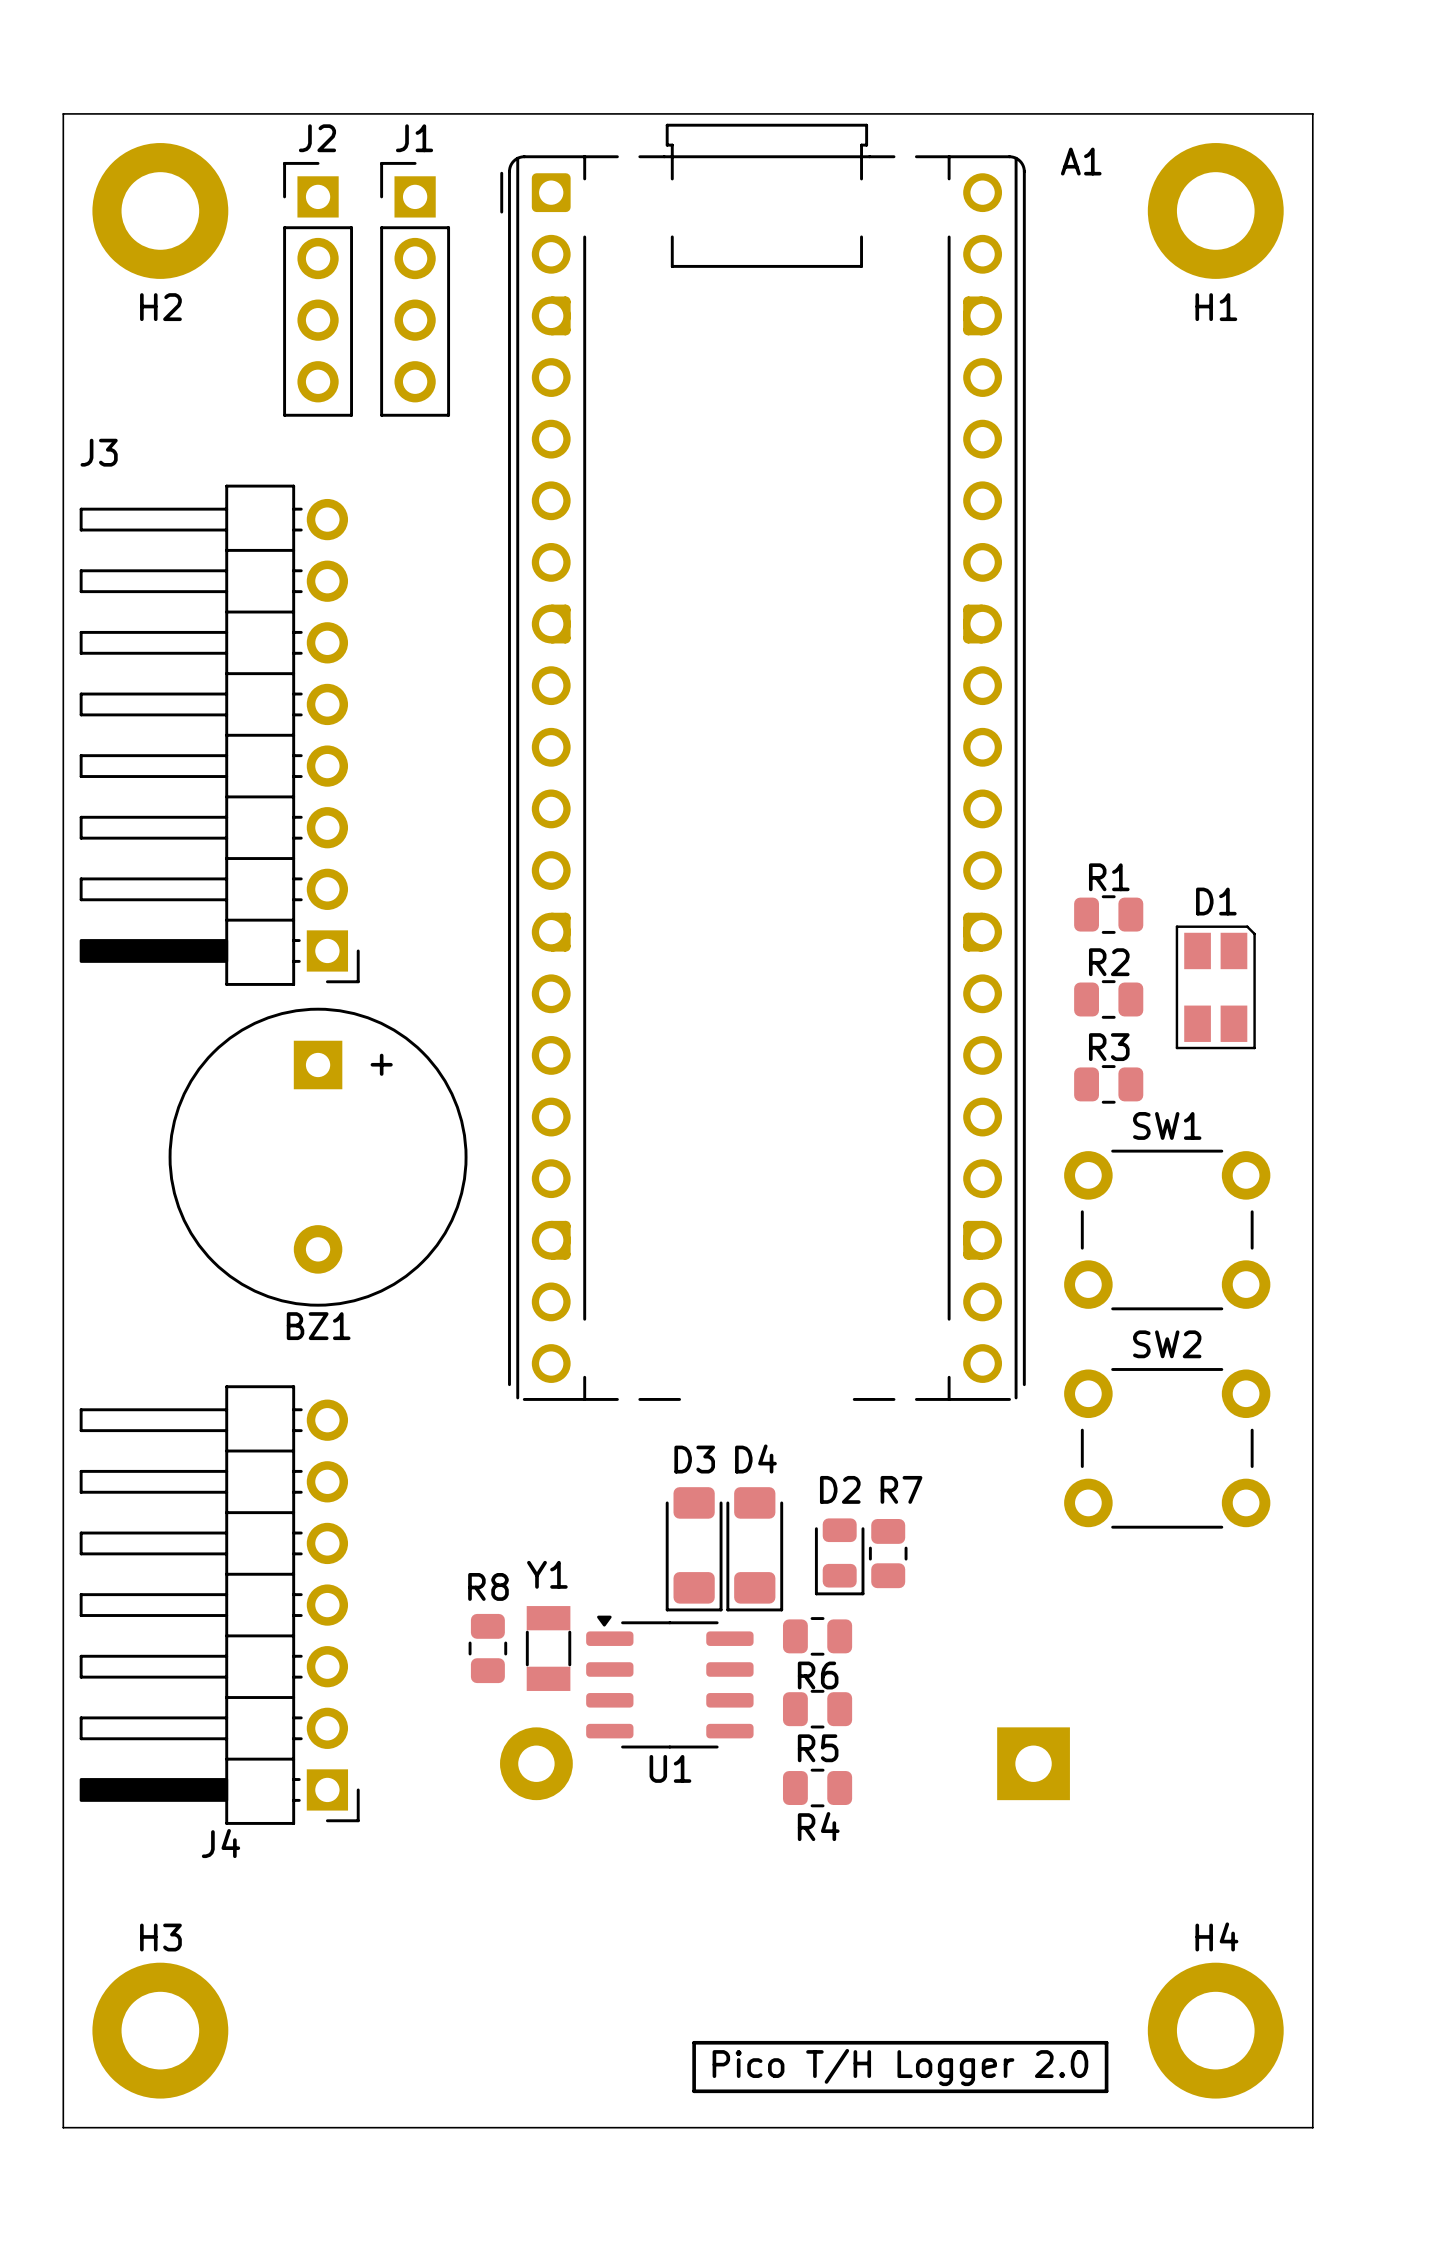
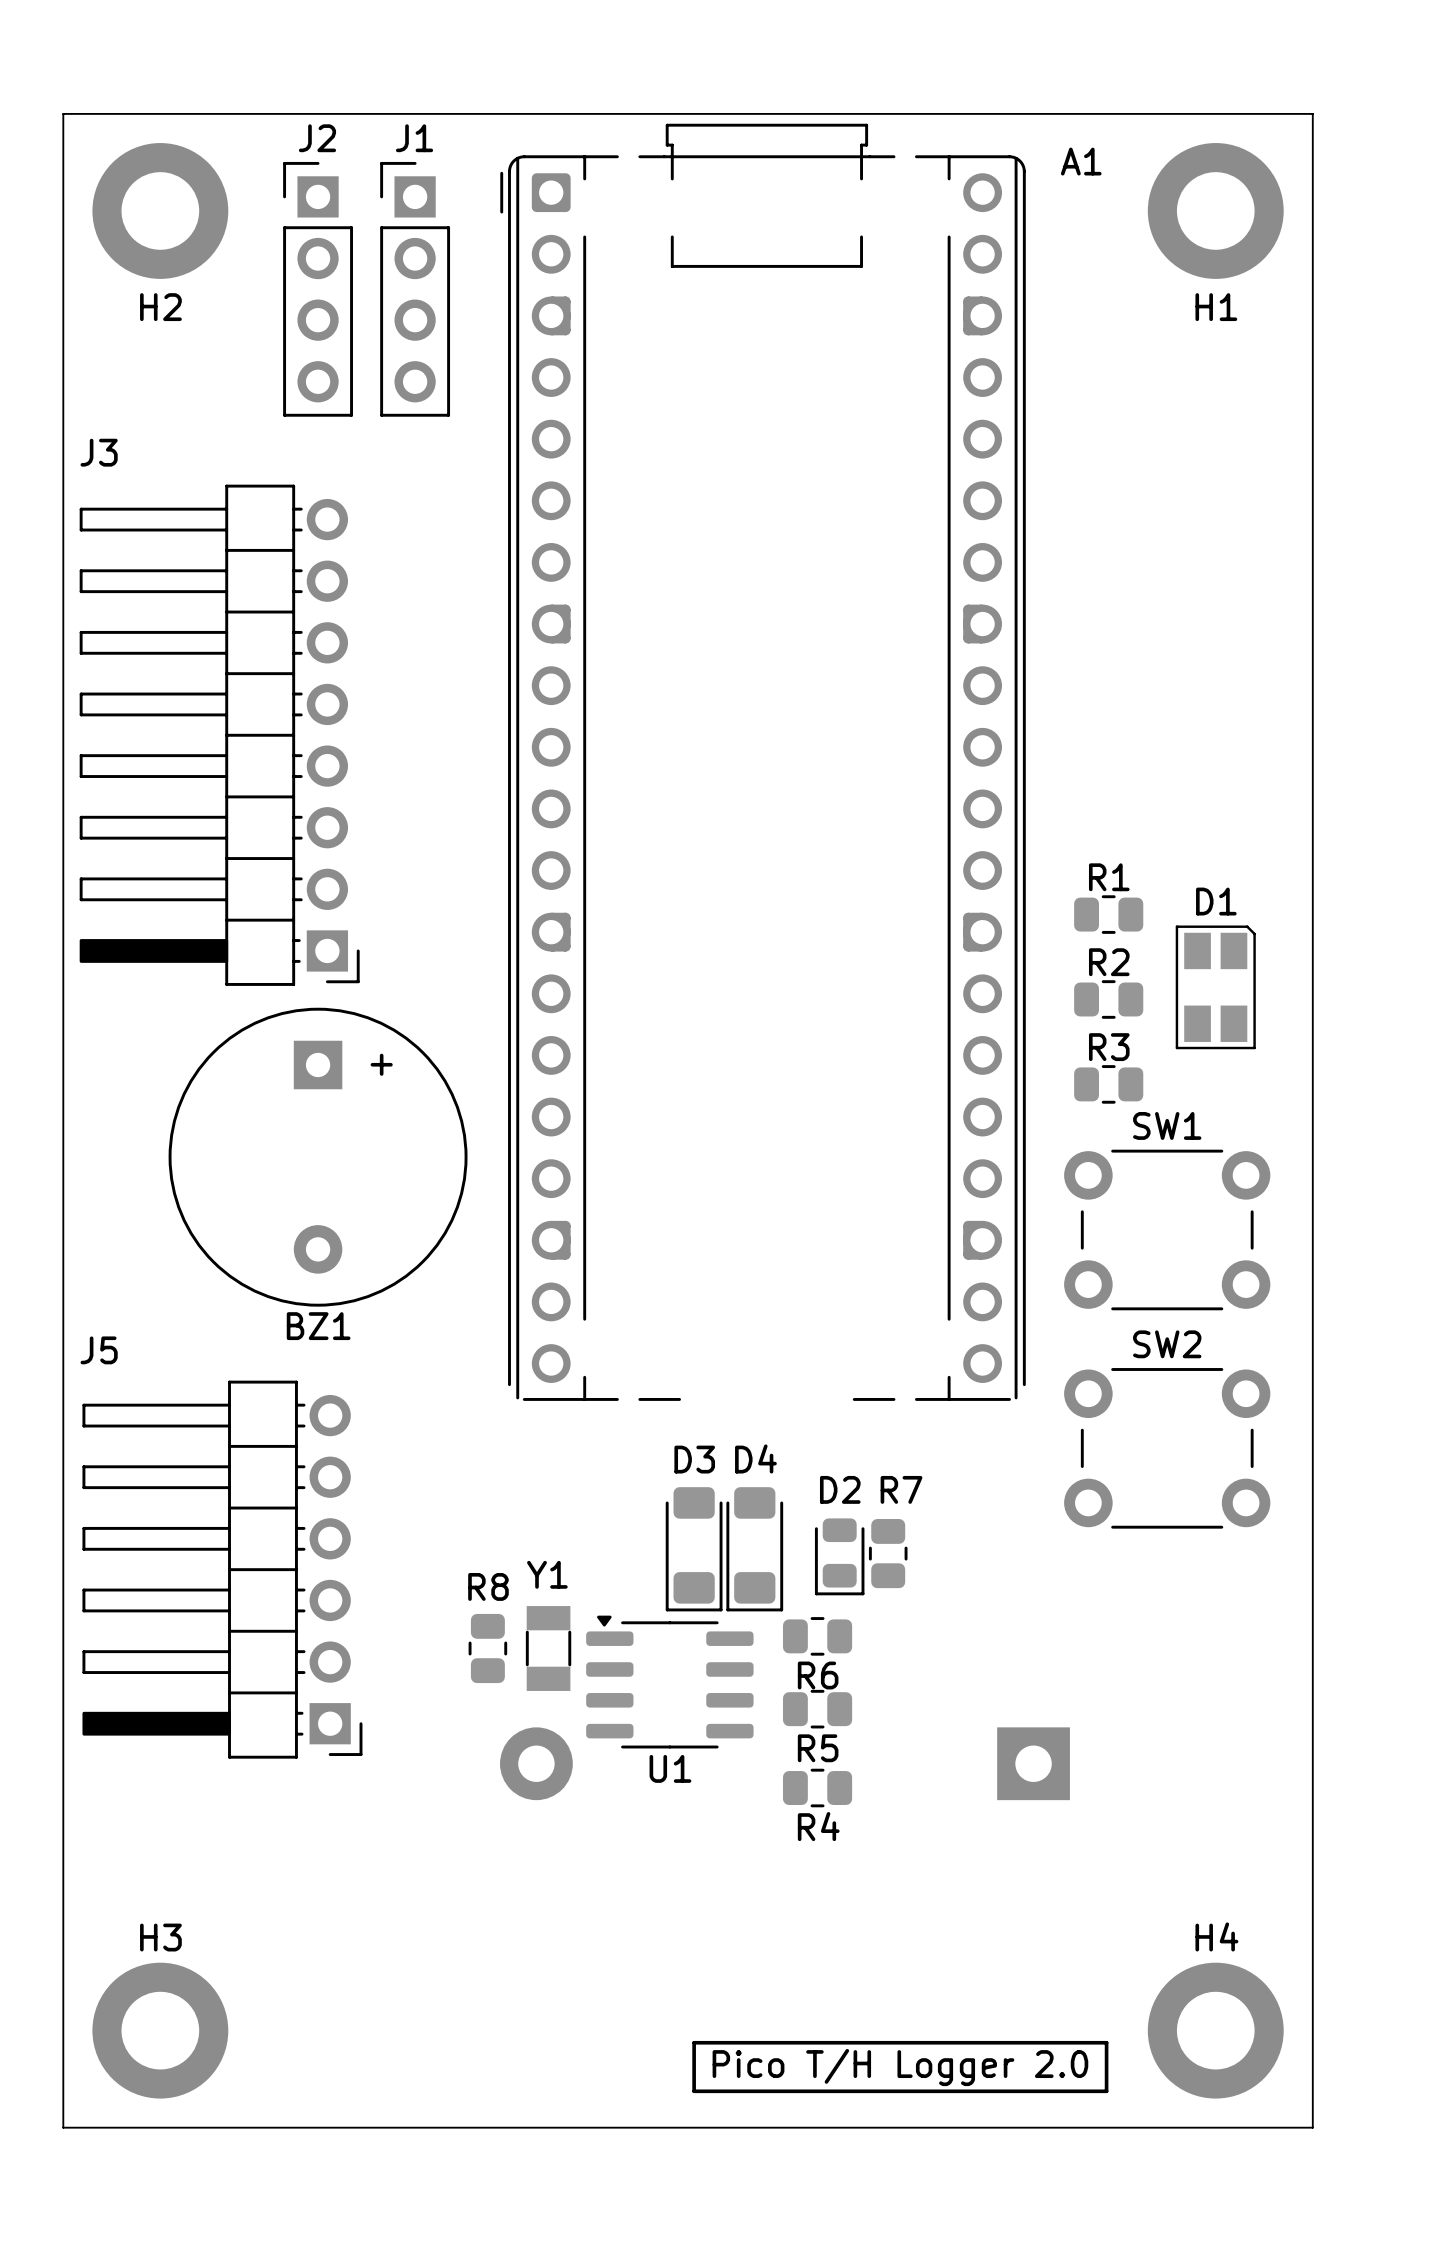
J5: none -> (222, 1569)
J4: (219, 1605) -> none

